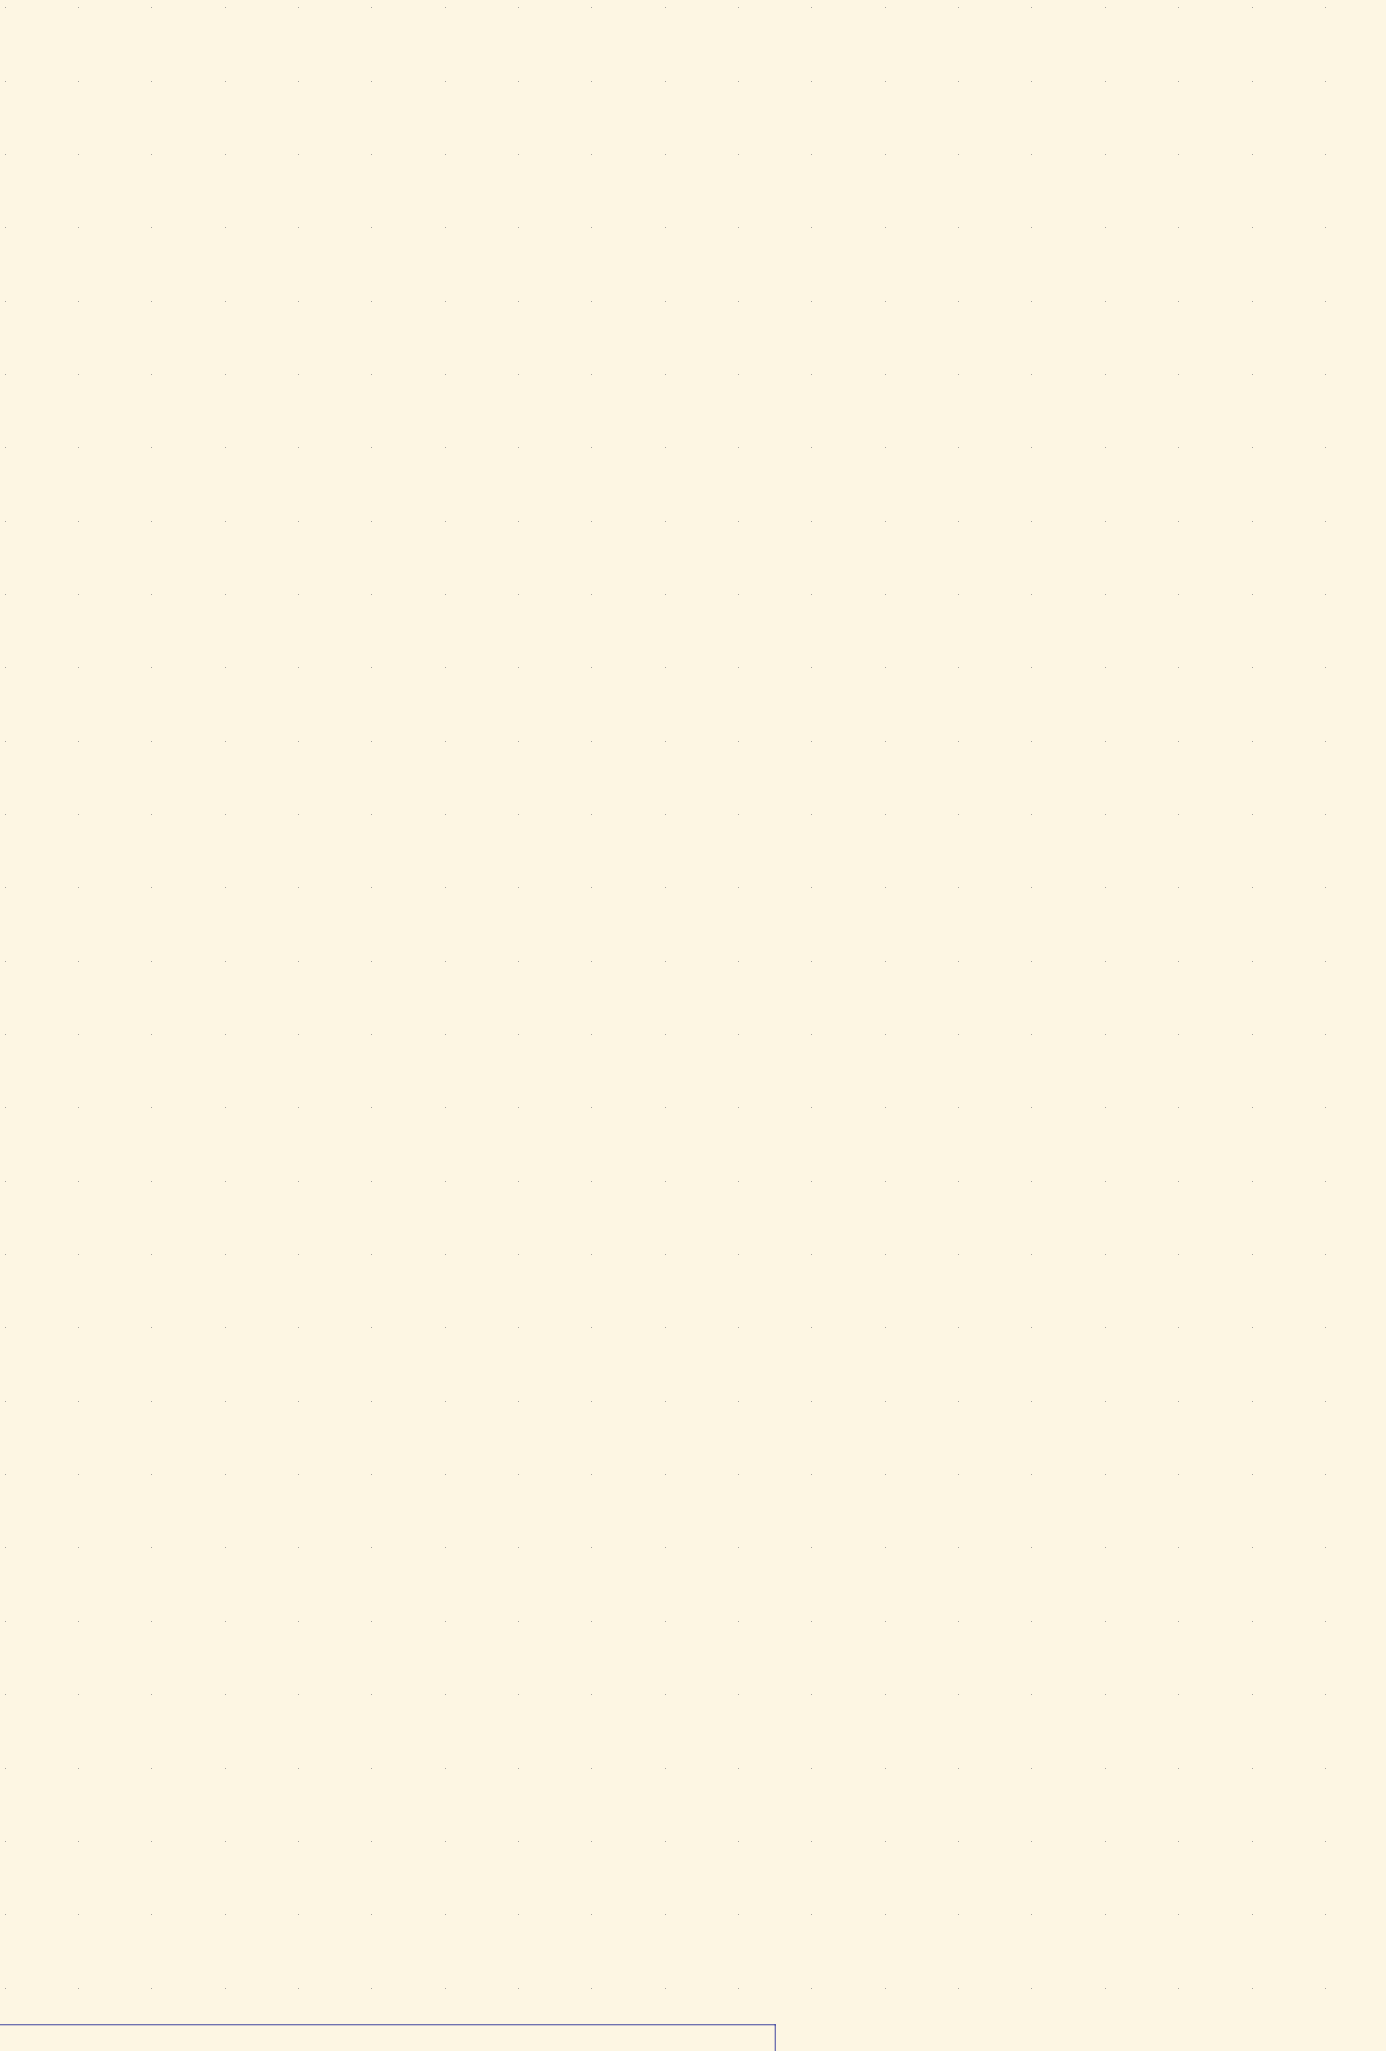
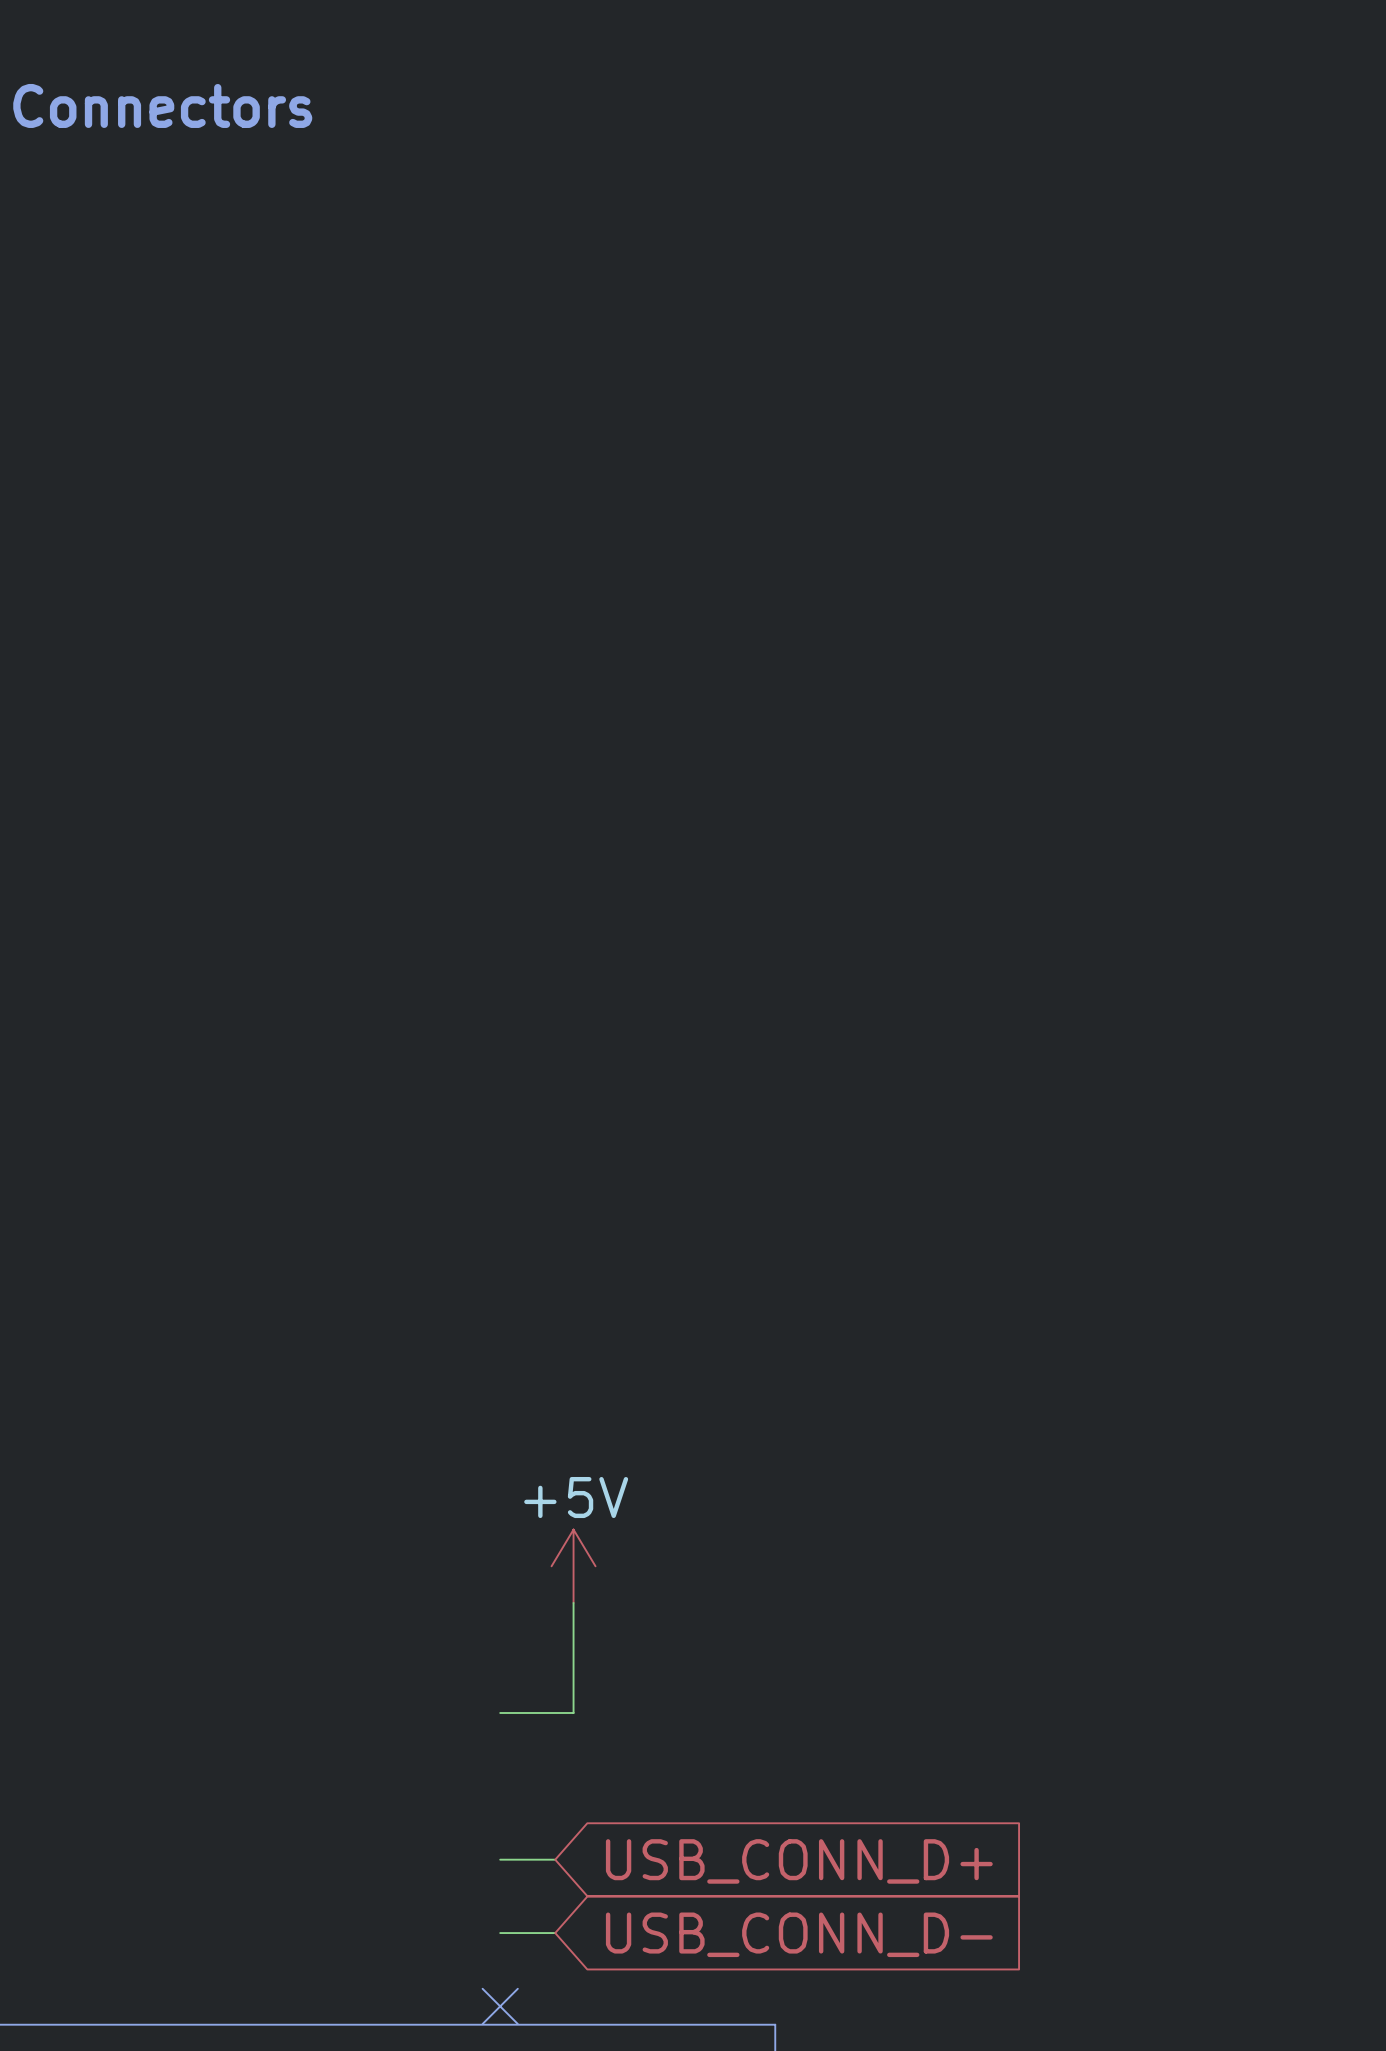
text: none -> Connectors (162, 105)
power symbol: none -> +5V (573, 1566)
wire: none -> (573, 1602) (573, 1712) (500, 1712)
wire: none -> (500, 1859) (555, 1859)
global label: none -> USB_CONN_D+ (799, 1861)
wire: none -> (500, 1933) (555, 1933)
global label: none -> USB_CONN_D- (799, 1934)
no-connect mark: none -> (500, 2006)

